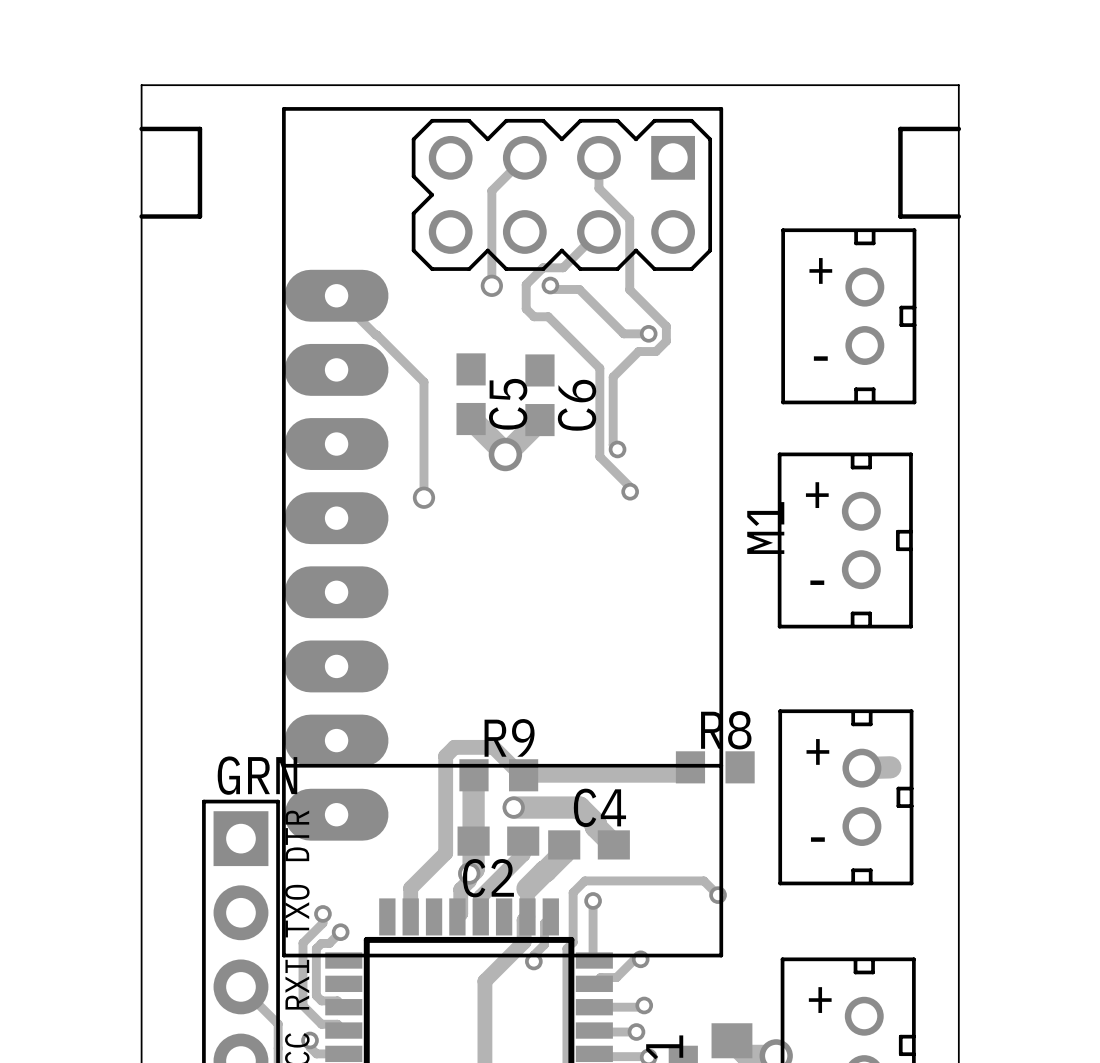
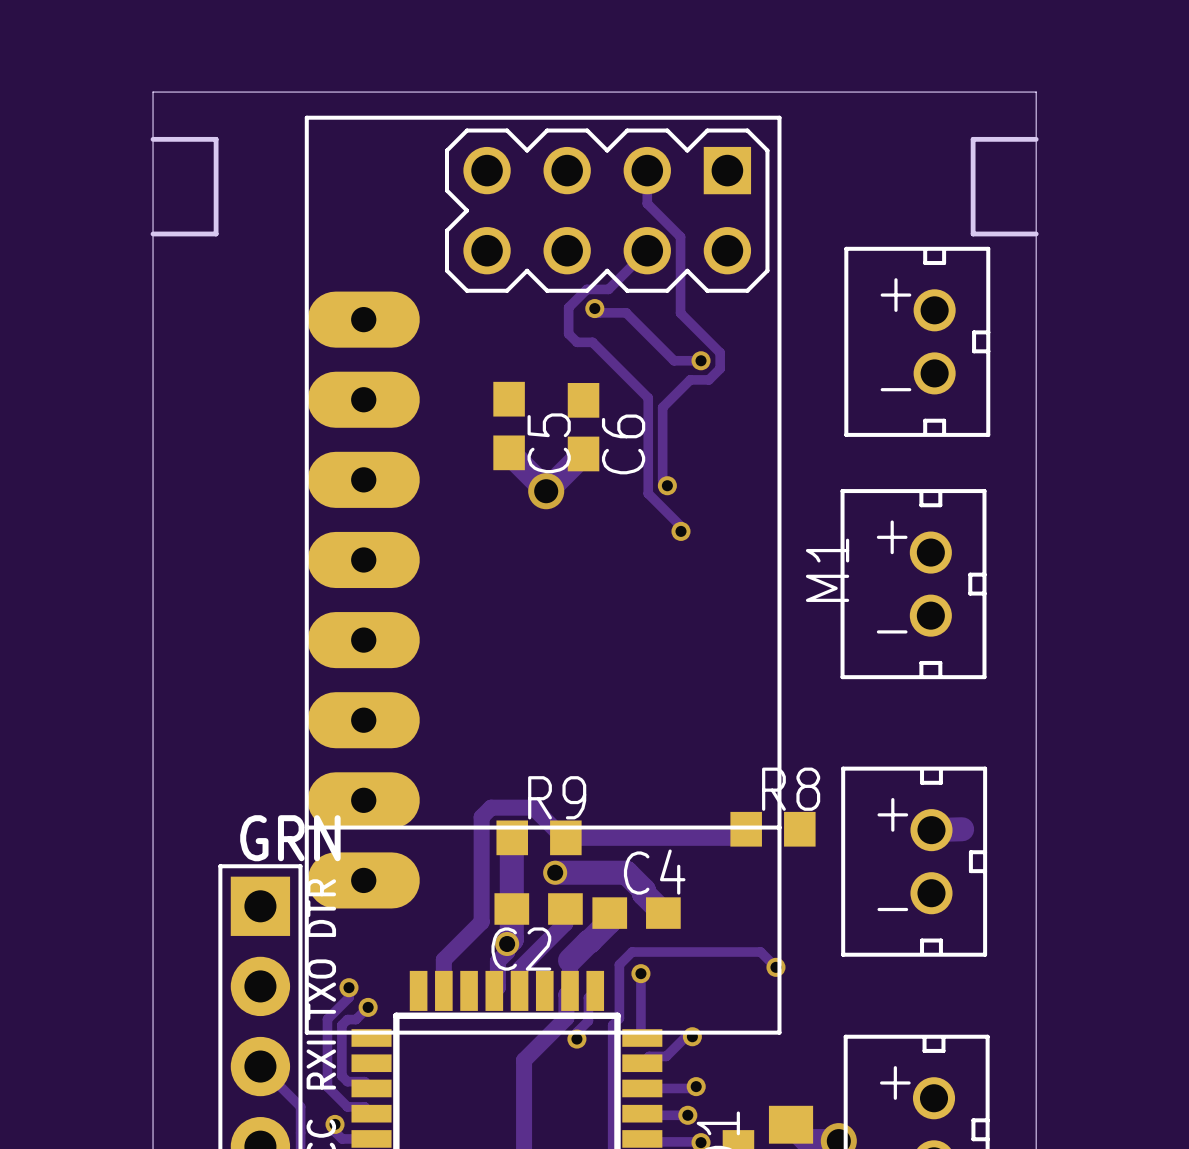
track: (524, 157) (491, 190) (491, 285) -> none
via: (491, 285) -> none
track: (336, 295) (423, 382) (423, 497) -> none
via: (423, 497) -> none

